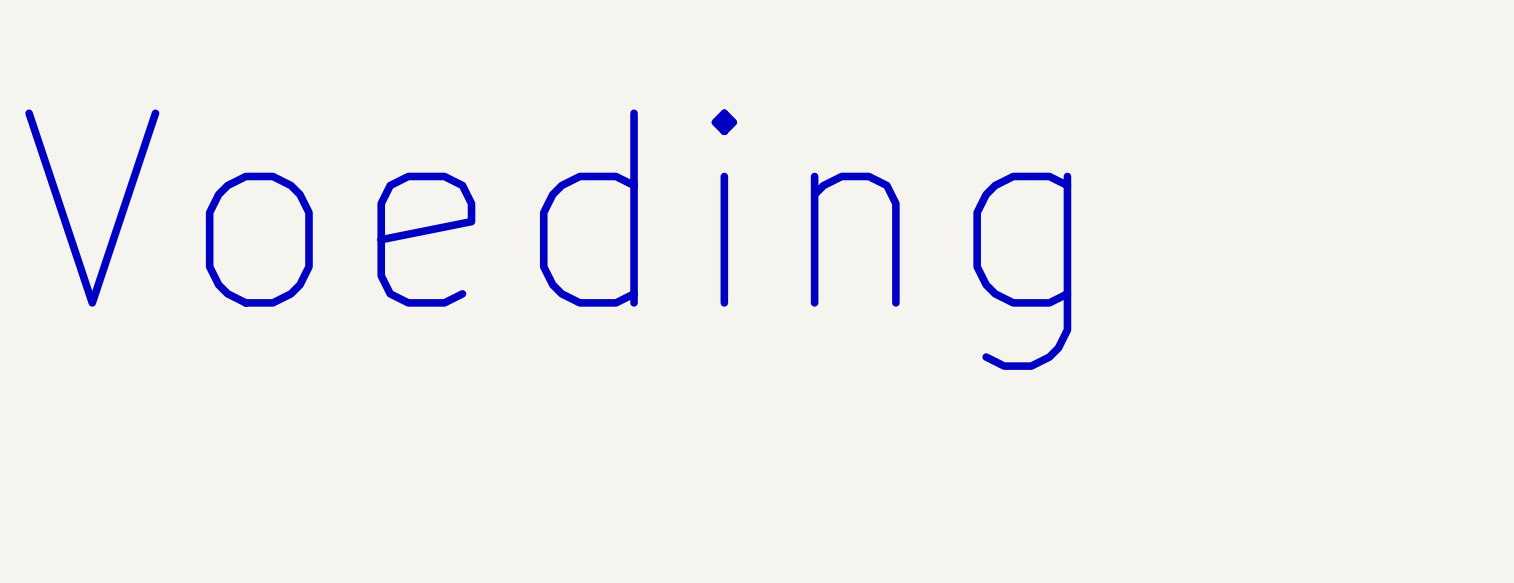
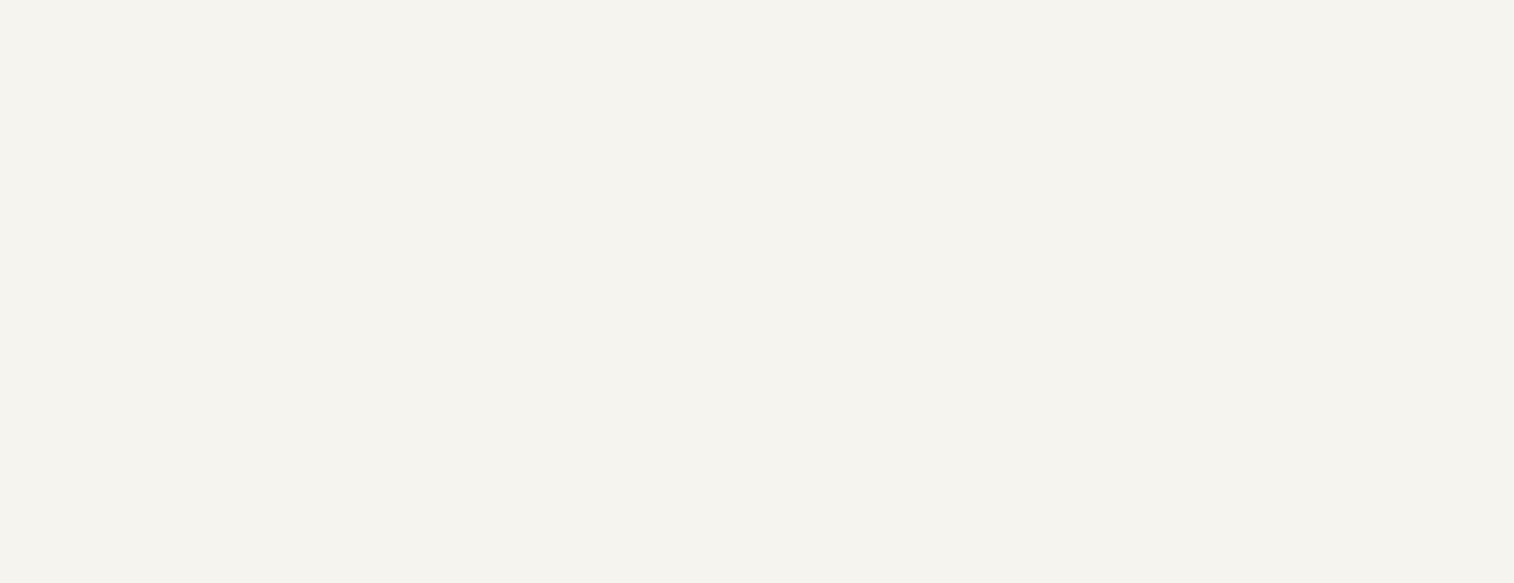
text: Voeding (548, 239) -> none

